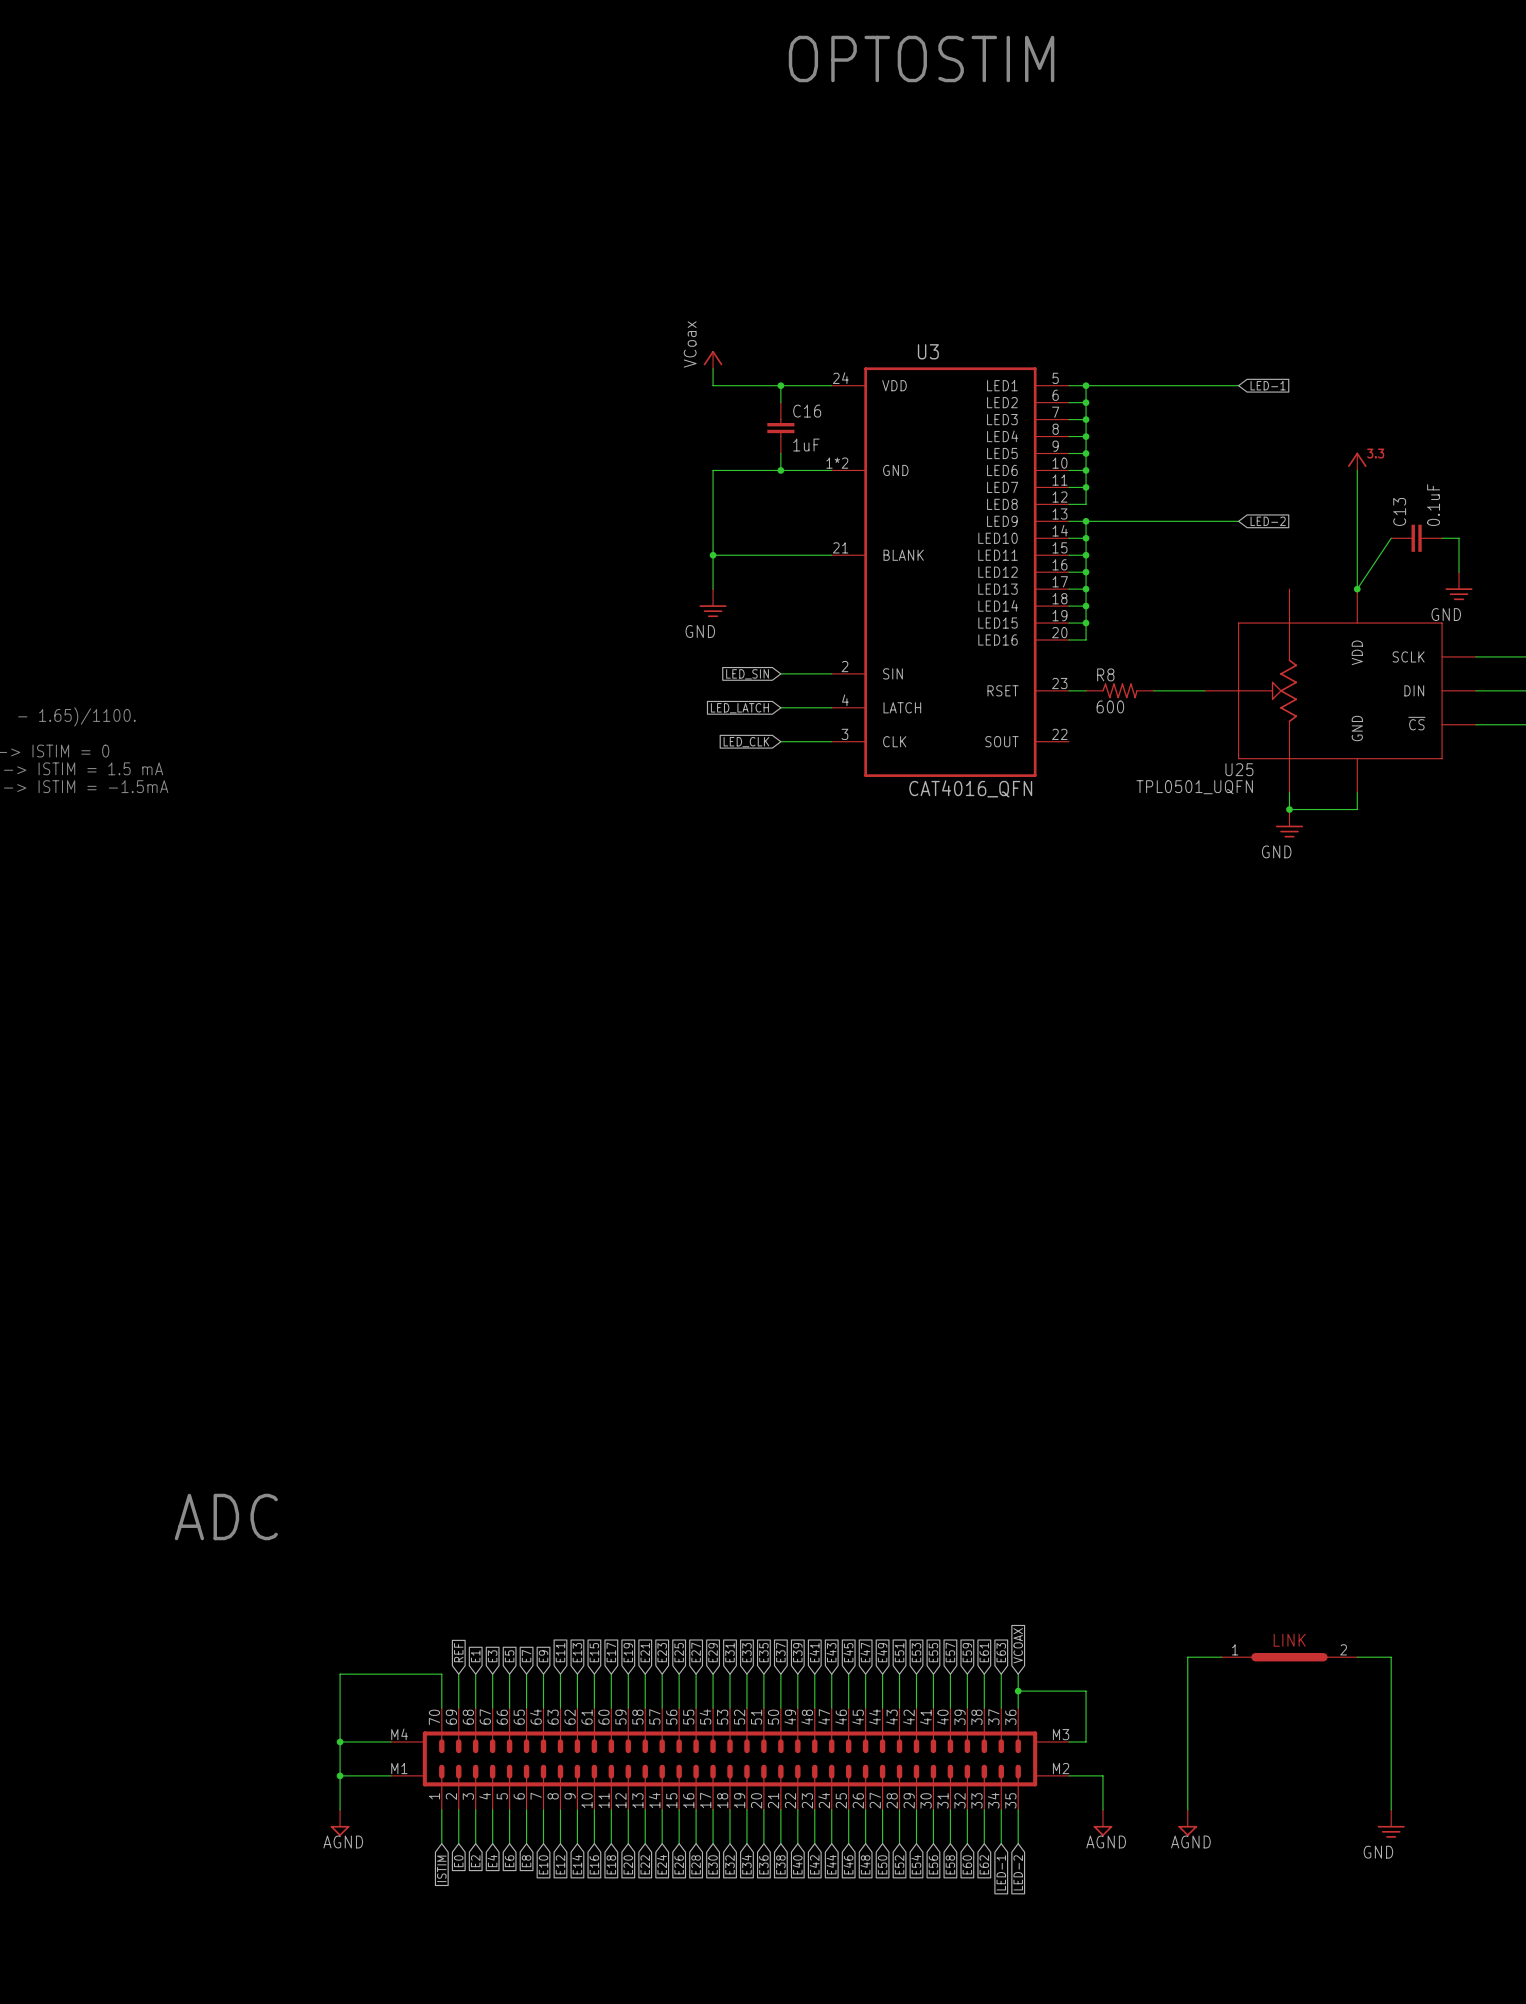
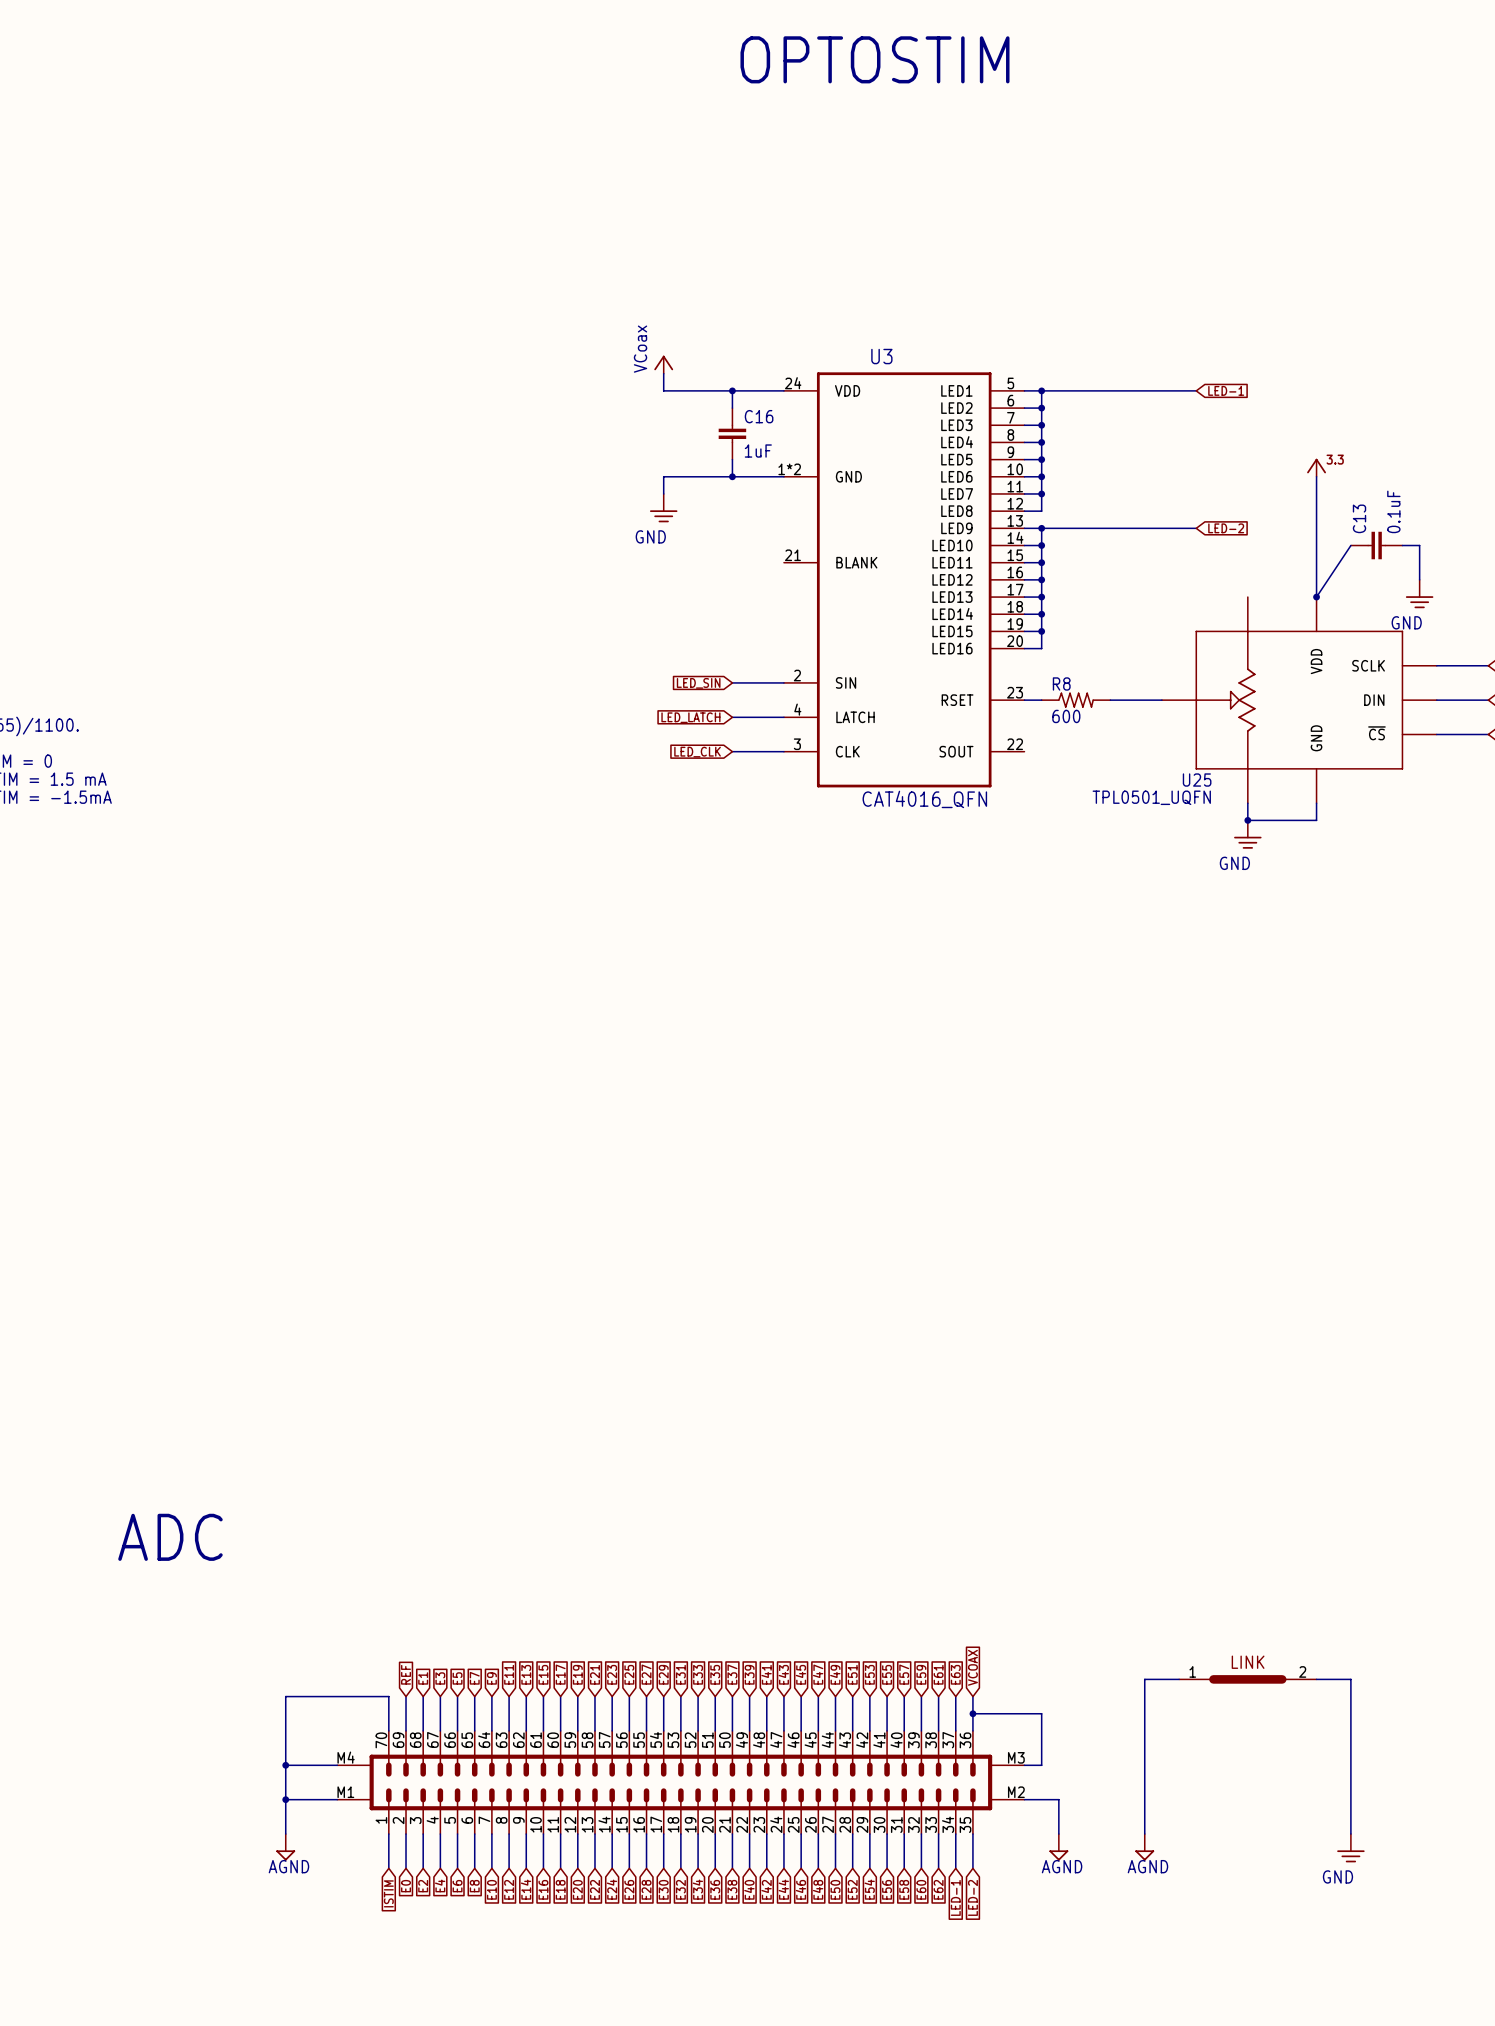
wire: (713, 487) (713, 589) -> none
wire: (713, 555) (831, 555) -> none
junction: (713, 555) -> none
power symbol position: GND (713, 603) -> GND (663, 508)

